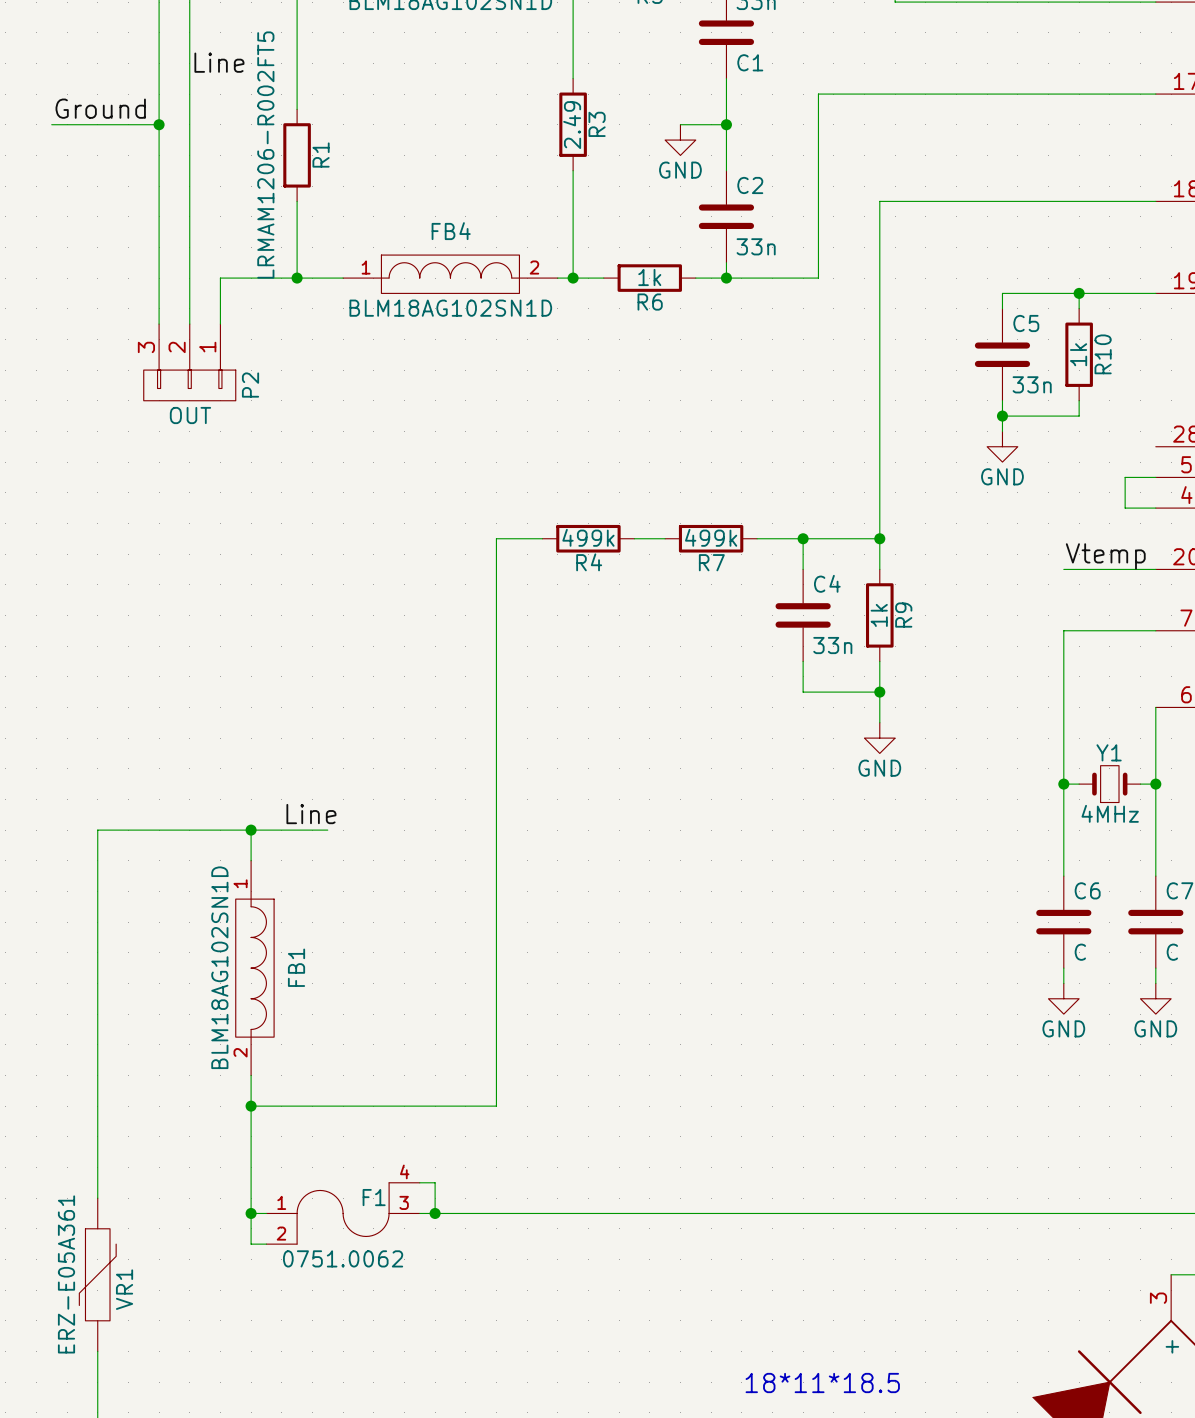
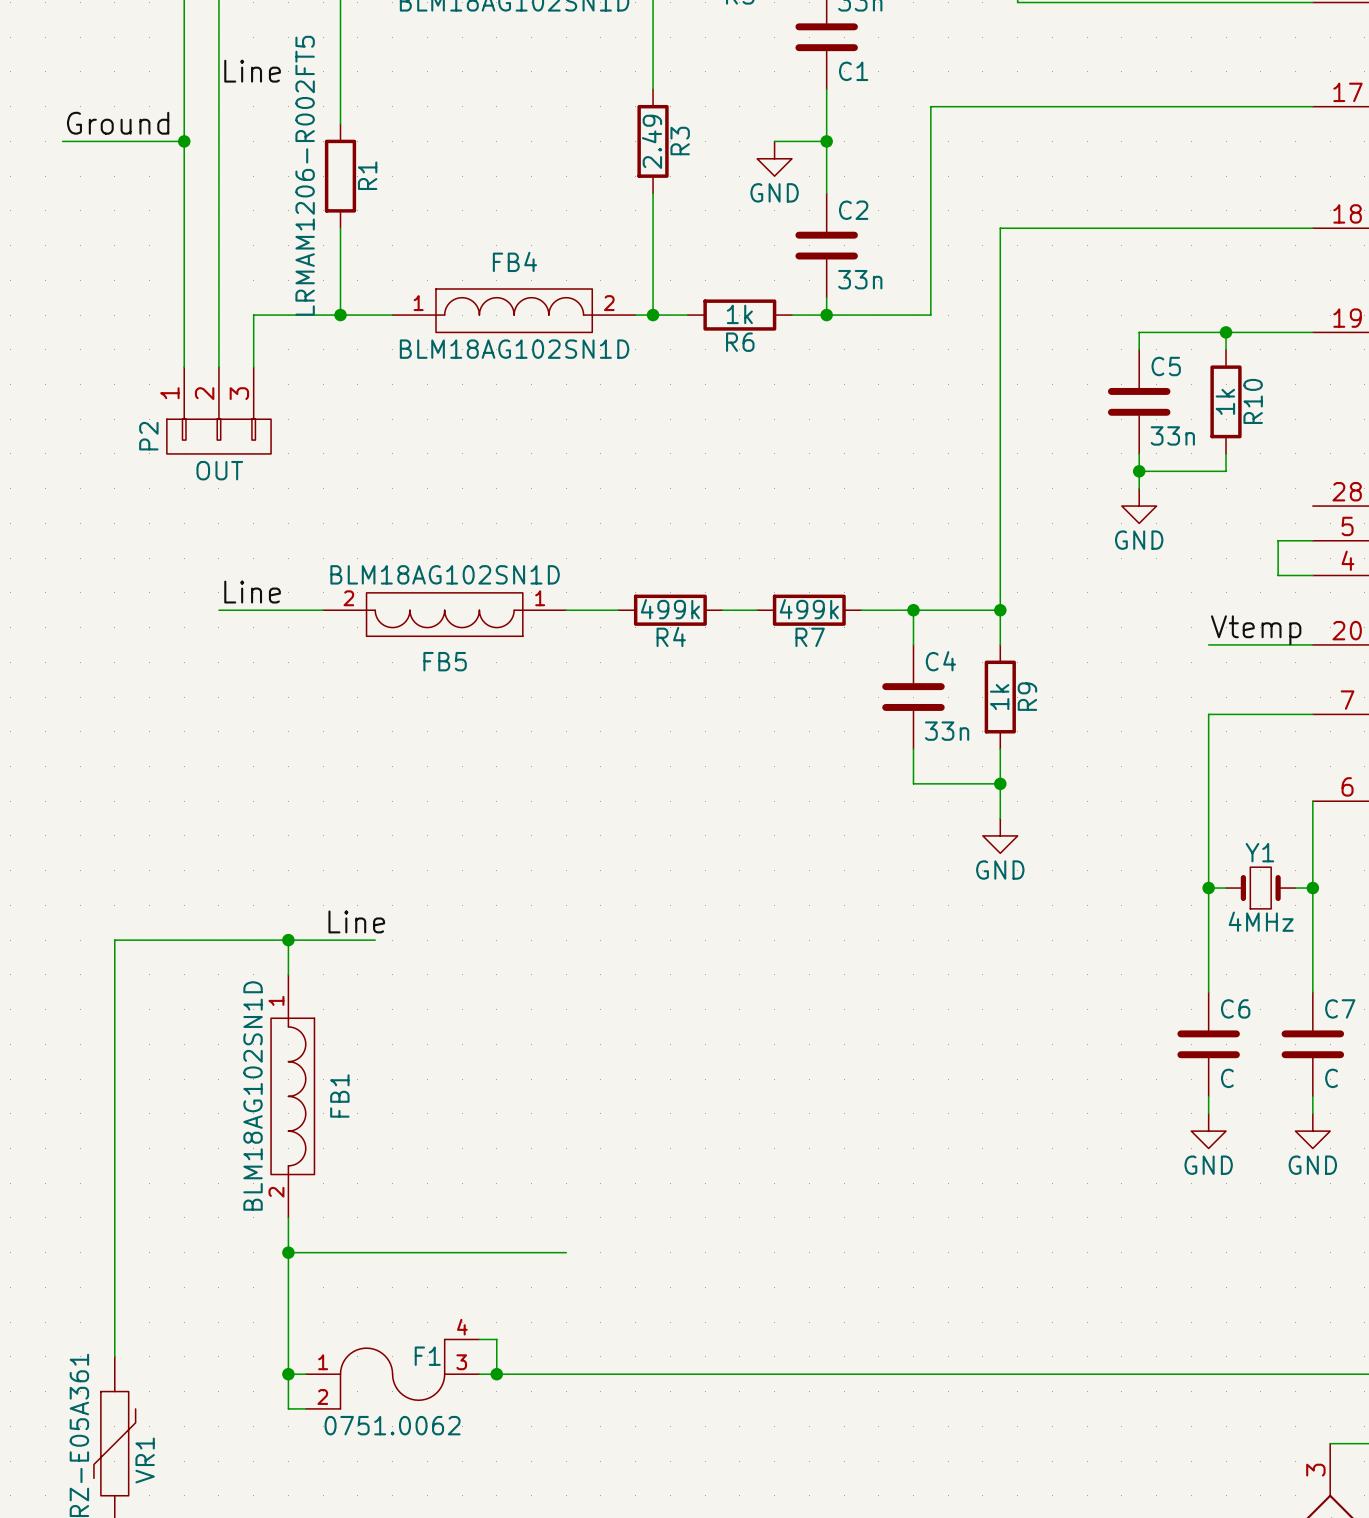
P2 flip: as is (189, 385) -> left-right (218, 436)
label: none -> Line (252, 592)
wire: none -> (218, 610) (323, 610)
wire: (496, 538) (496, 1106) -> none
FB5: none -> BLM18AG102SN1D (444, 614)

